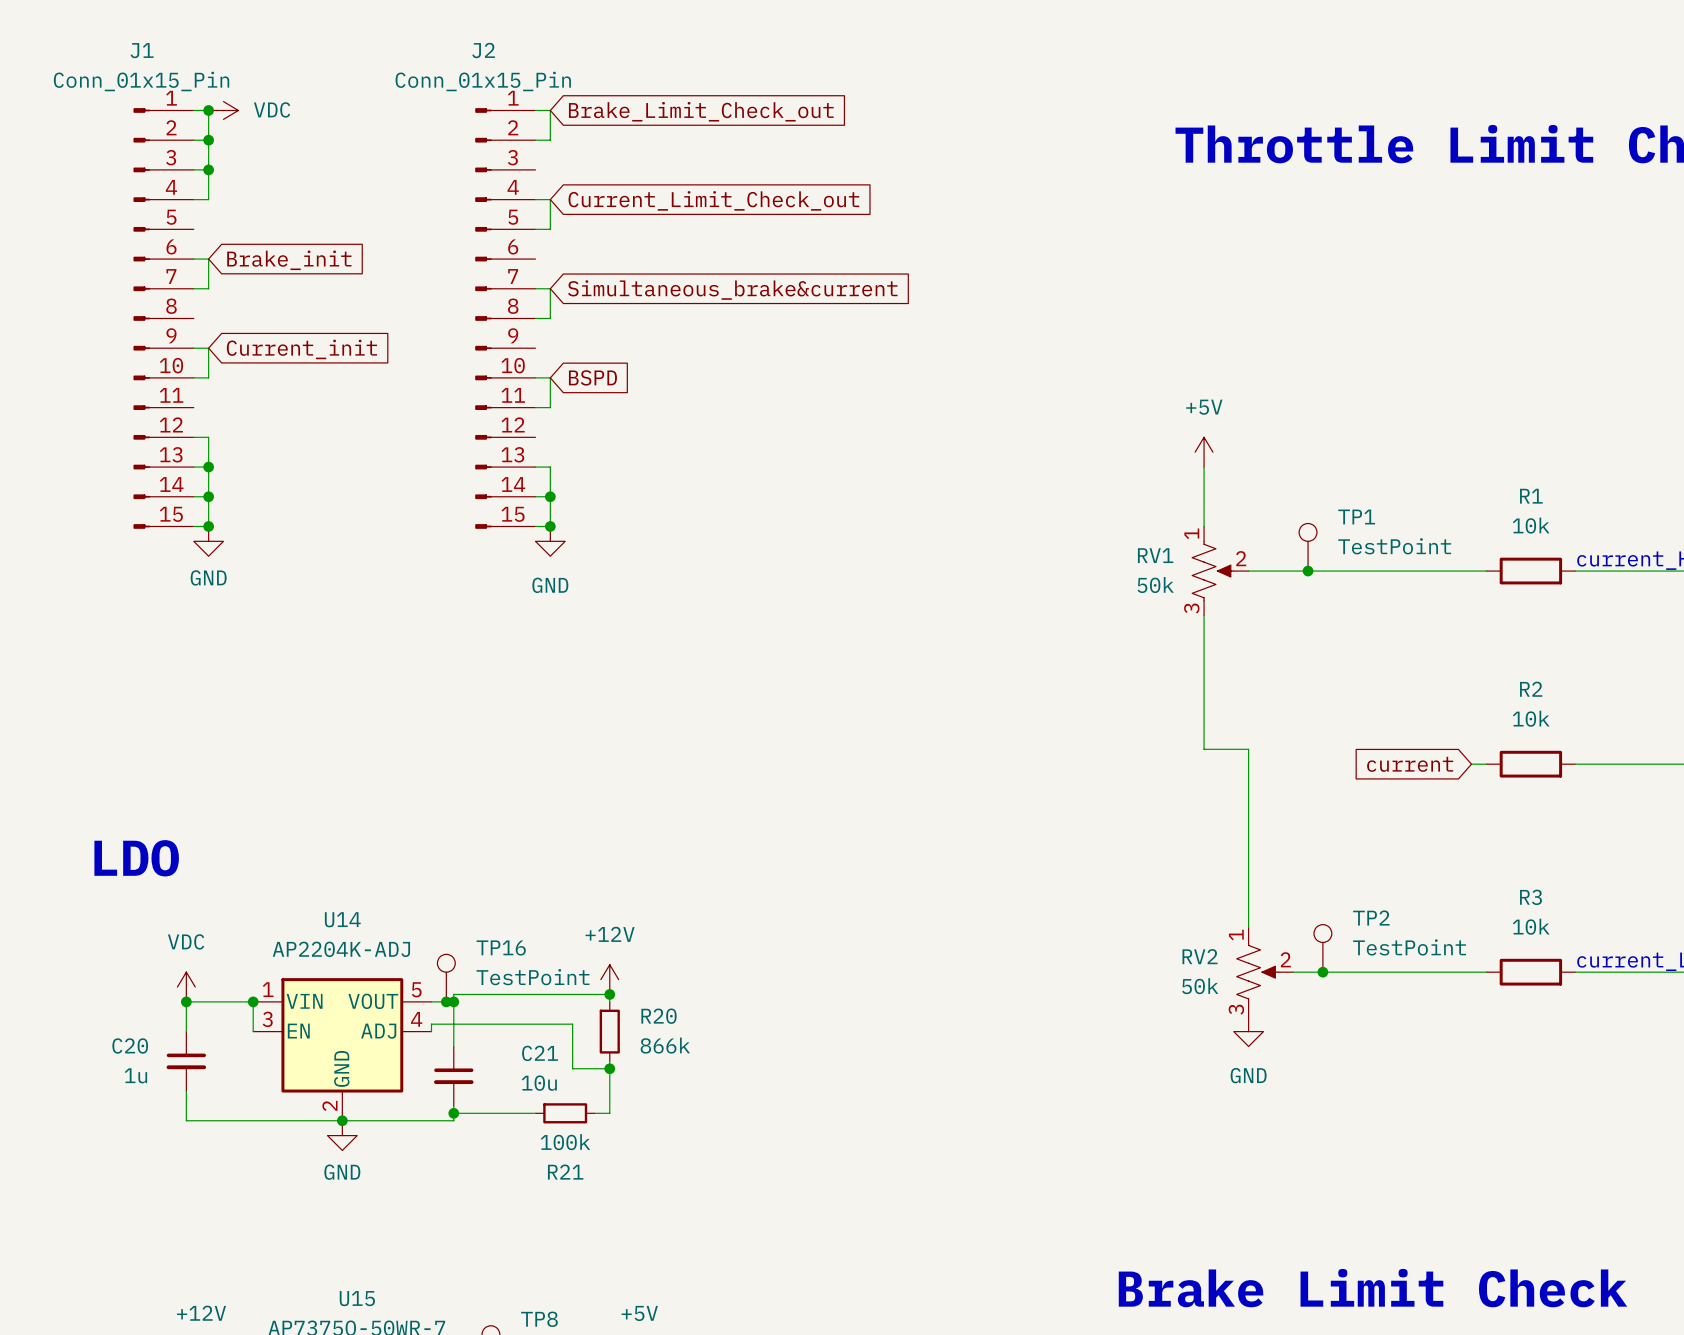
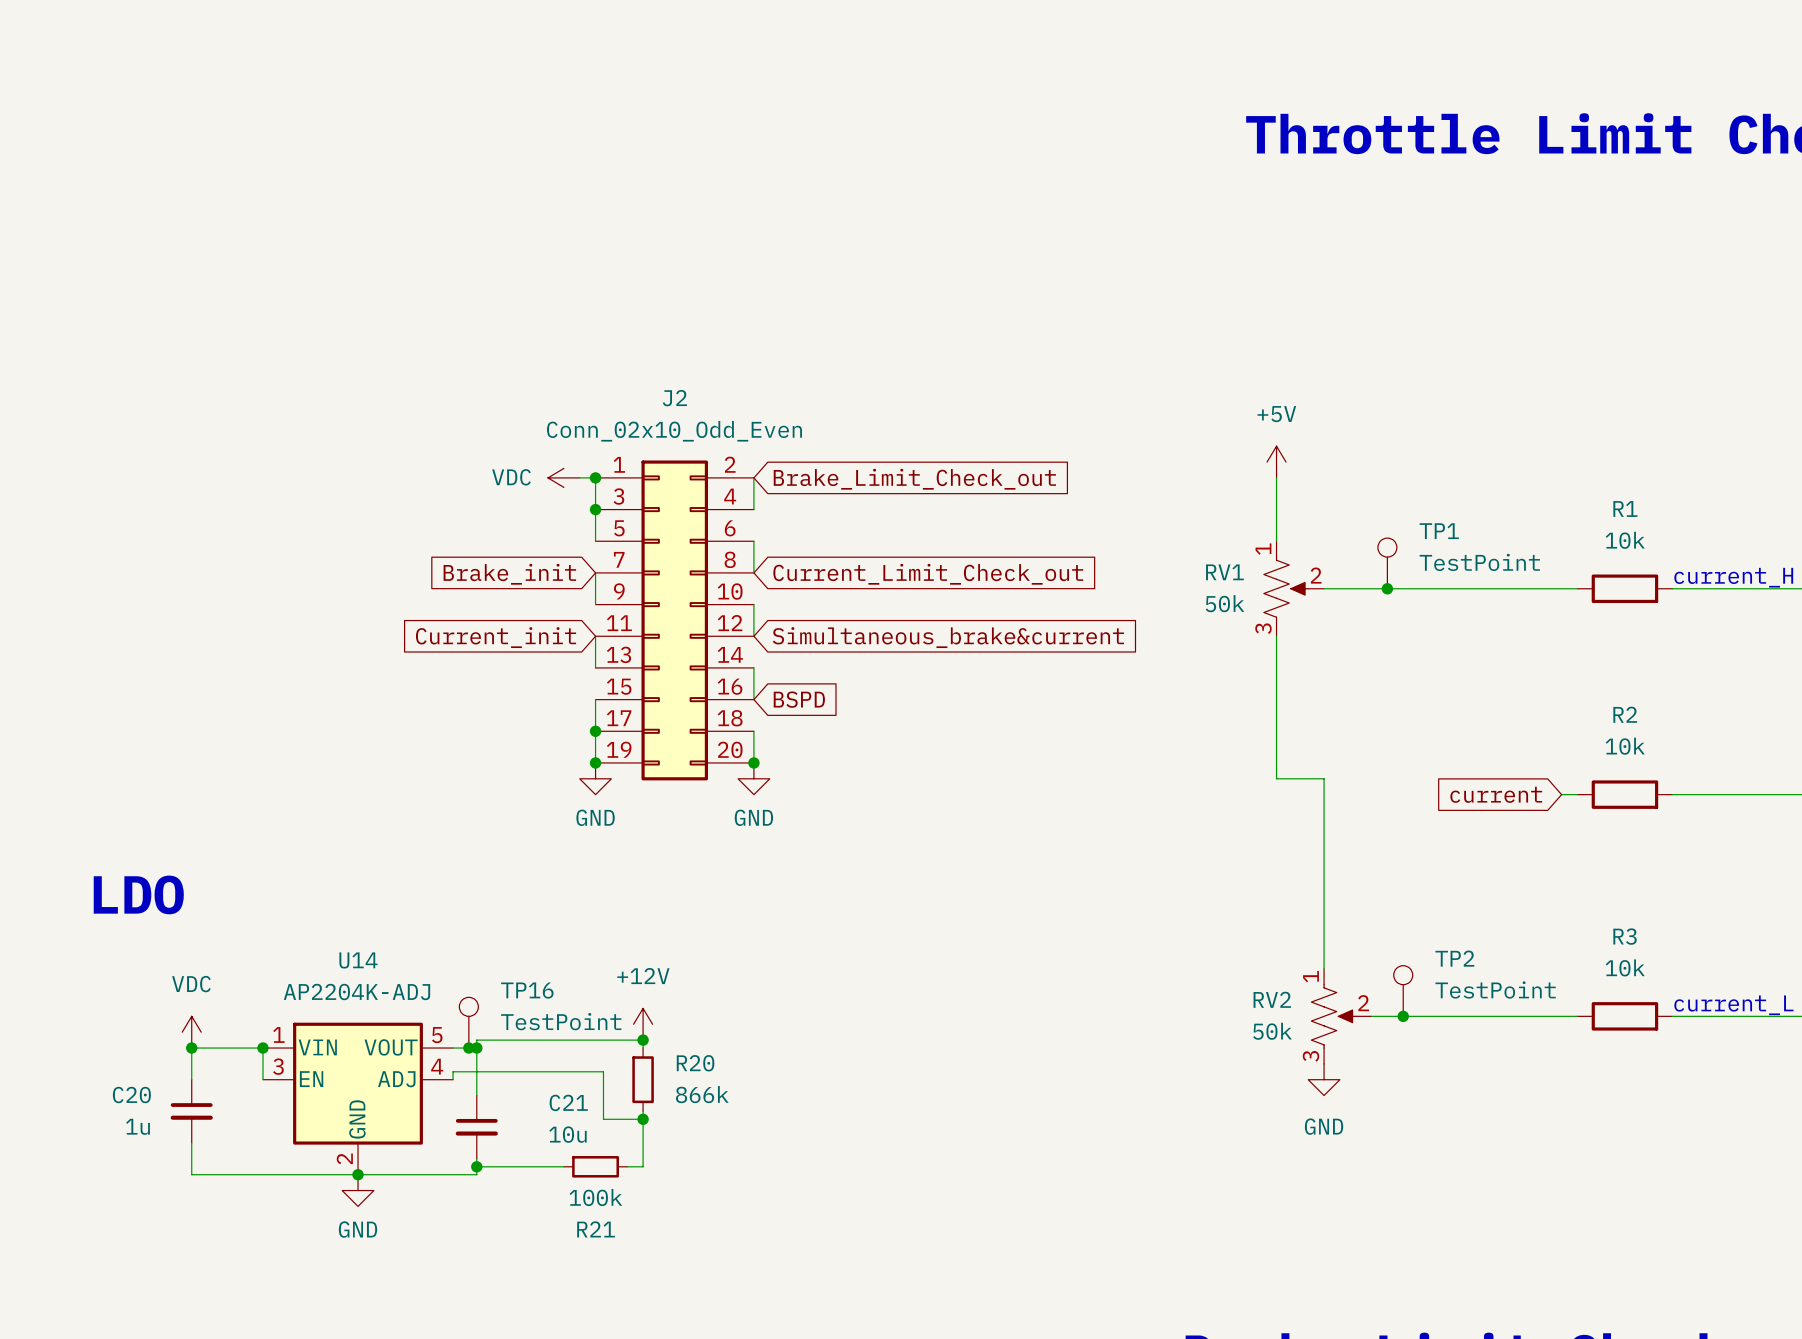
J2 name position: J2 (483, 50) -> J2 (674, 398)
J2 value: Conn_01x15_Pin (483, 81) -> Conn_02x10_Odd_Even (674, 431)
J2 symbol: [475, 108, 536, 529] -> [595, 460, 754, 781]
wire: (193, 110) (208, 110) (208, 199) (193, 199) -> none
junction: (208, 110) -> none
power symbol: VDC (223, 110) -> none
wire: (535, 110) (550, 110) (550, 140) (535, 140) -> none
global label: Brake_Limit_Check_out (701, 111) -> none
wire: (193, 140) (208, 140) -> none
junction: (208, 140) -> none
wire: (193, 169) (208, 169) -> none
junction: (208, 169) -> none
wire: (535, 199) (550, 199) (550, 229) (535, 229) -> none
global label: Current_Limit_Check_out (713, 200) -> none
wire: (193, 259) (208, 259) (208, 288) (193, 288) -> none
global label: Brake_init (289, 260) -> none
wire: (535, 288) (550, 288) (550, 318) (535, 318) -> none
global label: Simultaneous_brake&current (732, 290) -> none
J1: Conn_01x15_Pin (163, 318) -> none
wire: (193, 348) (208, 348) (208, 377) (193, 377) -> none
global label: Current_init (301, 349) -> none
wire: (535, 377) (550, 377) (550, 407) (535, 407) -> none
global label: BSPD (592, 377) -> none
wire: (193, 437) (208, 437) (208, 526) (193, 526) -> none
wire: (193, 467) (208, 467) -> none
junction: (208, 467) -> none
wire: (535, 467) (550, 467) (550, 526) (535, 526) -> none
power symbol: none -> VDC (563, 477)
wire: none -> (579, 477) (595, 477) (595, 541)
junction: none -> (595, 477)
wire: none -> (753, 477) (753, 509)
global label: none -> Brake_Limit_Check_out (914, 479)
wire: (193, 496) (208, 496) -> none
junction: (208, 496) -> none
wire: (535, 496) (550, 496) -> none
junction position: (550, 496) -> (595, 509)
junction: (208, 526) -> none
junction: (550, 526) -> none
wire: none -> (753, 541) (753, 572)
power symbol: GND (208, 541) -> none
power symbol: GND (550, 541) -> none
wire: none -> (595, 572) (595, 604)
global label: none -> Brake_init (509, 574)
global label: none -> Current_Limit_Check_out (928, 574)
wire: none -> (753, 604) (753, 636)
wire: none -> (595, 636) (595, 667)
global label: none -> Current_init (496, 637)
global label: none -> Simultaneous_brake&current (948, 637)
wire: none -> (753, 667) (753, 699)
wire: none -> (595, 699) (595, 762)
global label: none -> BSPD (799, 699)
junction: none -> (595, 731)
wire: none -> (753, 731) (753, 762)
junction: none -> (595, 762)
junction: none -> (753, 762)
power symbol: none -> GND (595, 778)
power symbol: none -> GND (753, 778)

